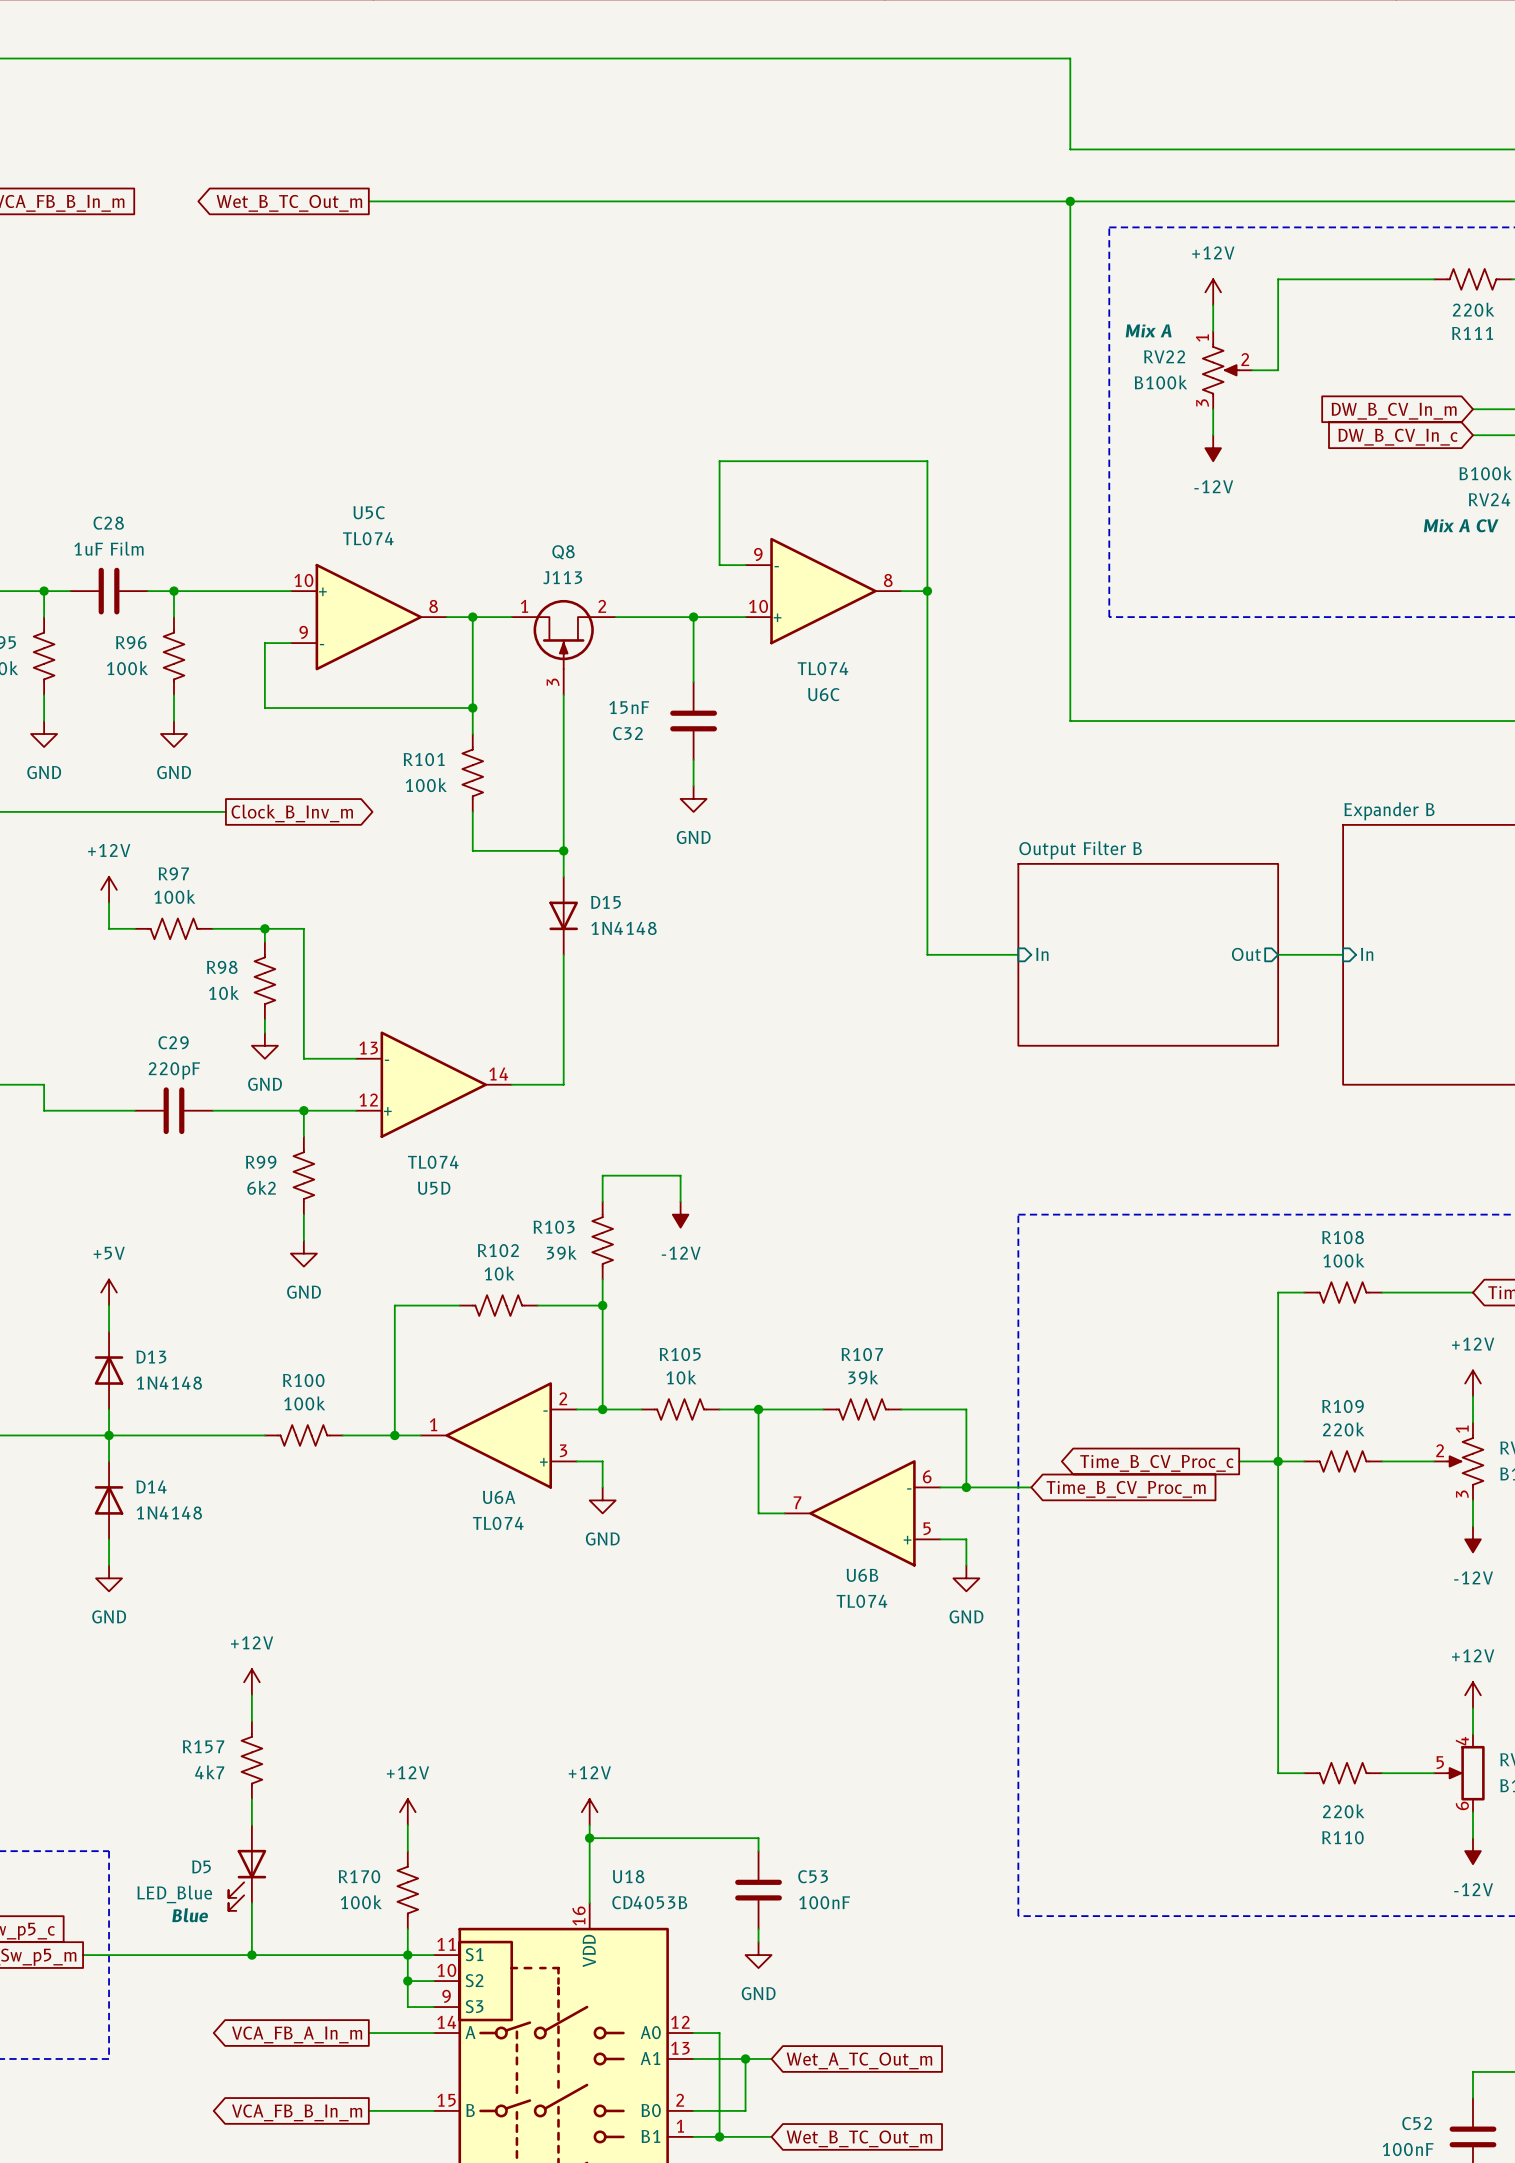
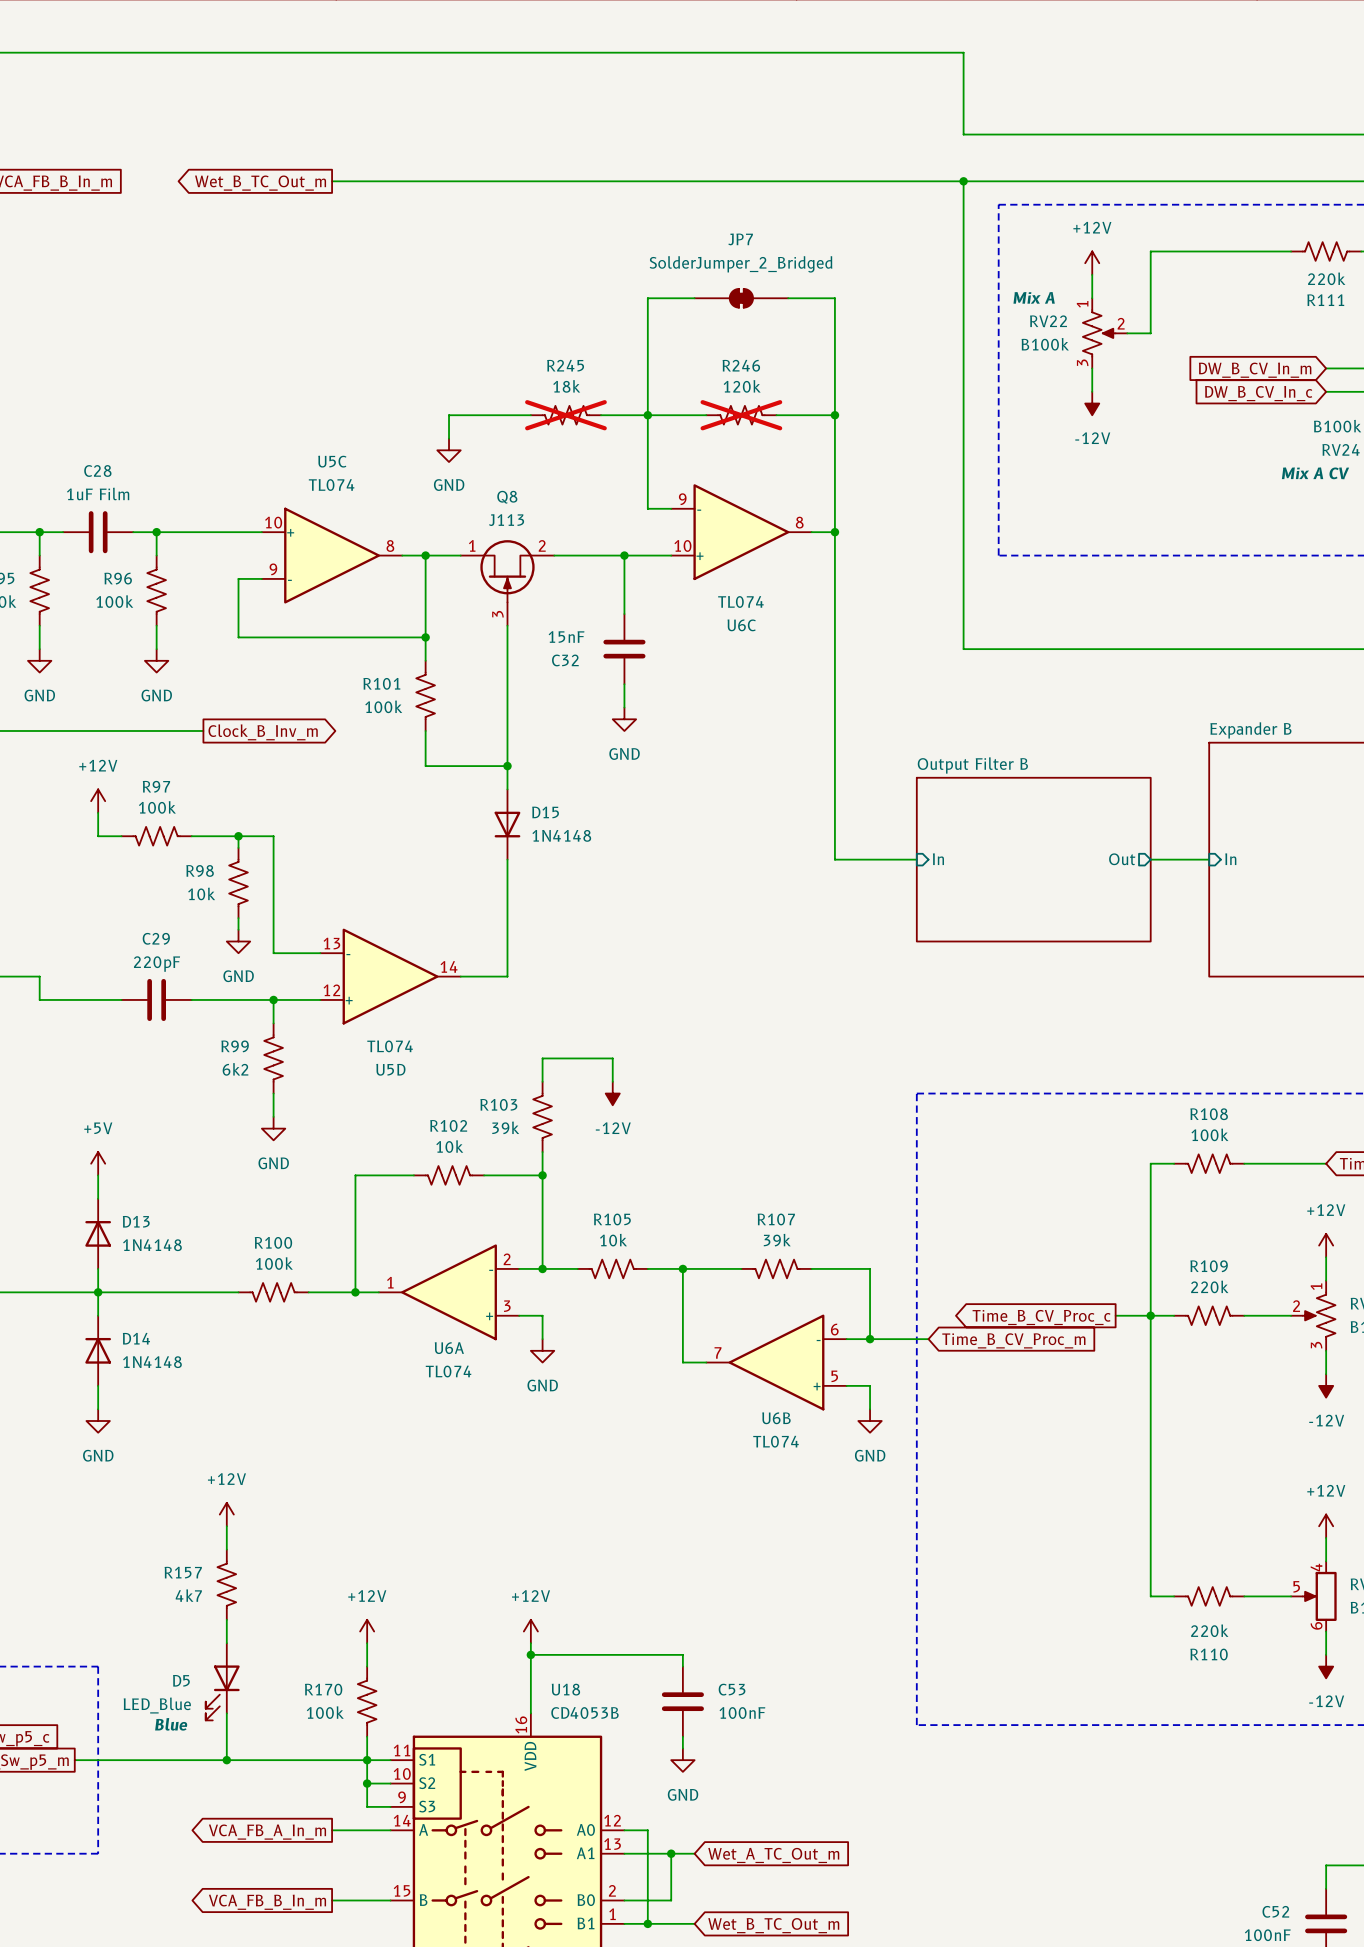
wire: none -> (694, 298) (647, 298) (647, 415) (601, 415)
JP7: none -> SolderJumper_2_Bridged (741, 298)
wire: none -> (788, 298) (834, 298) (834, 415)
wire: none -> (530, 415) (449, 415) (449, 438)
R245: none -> 18k (565, 415)
junction: none -> (647, 415)
R246: none -> 120k (741, 415)
junction: none -> (834, 415)
power symbol: none -> GND (449, 450)

